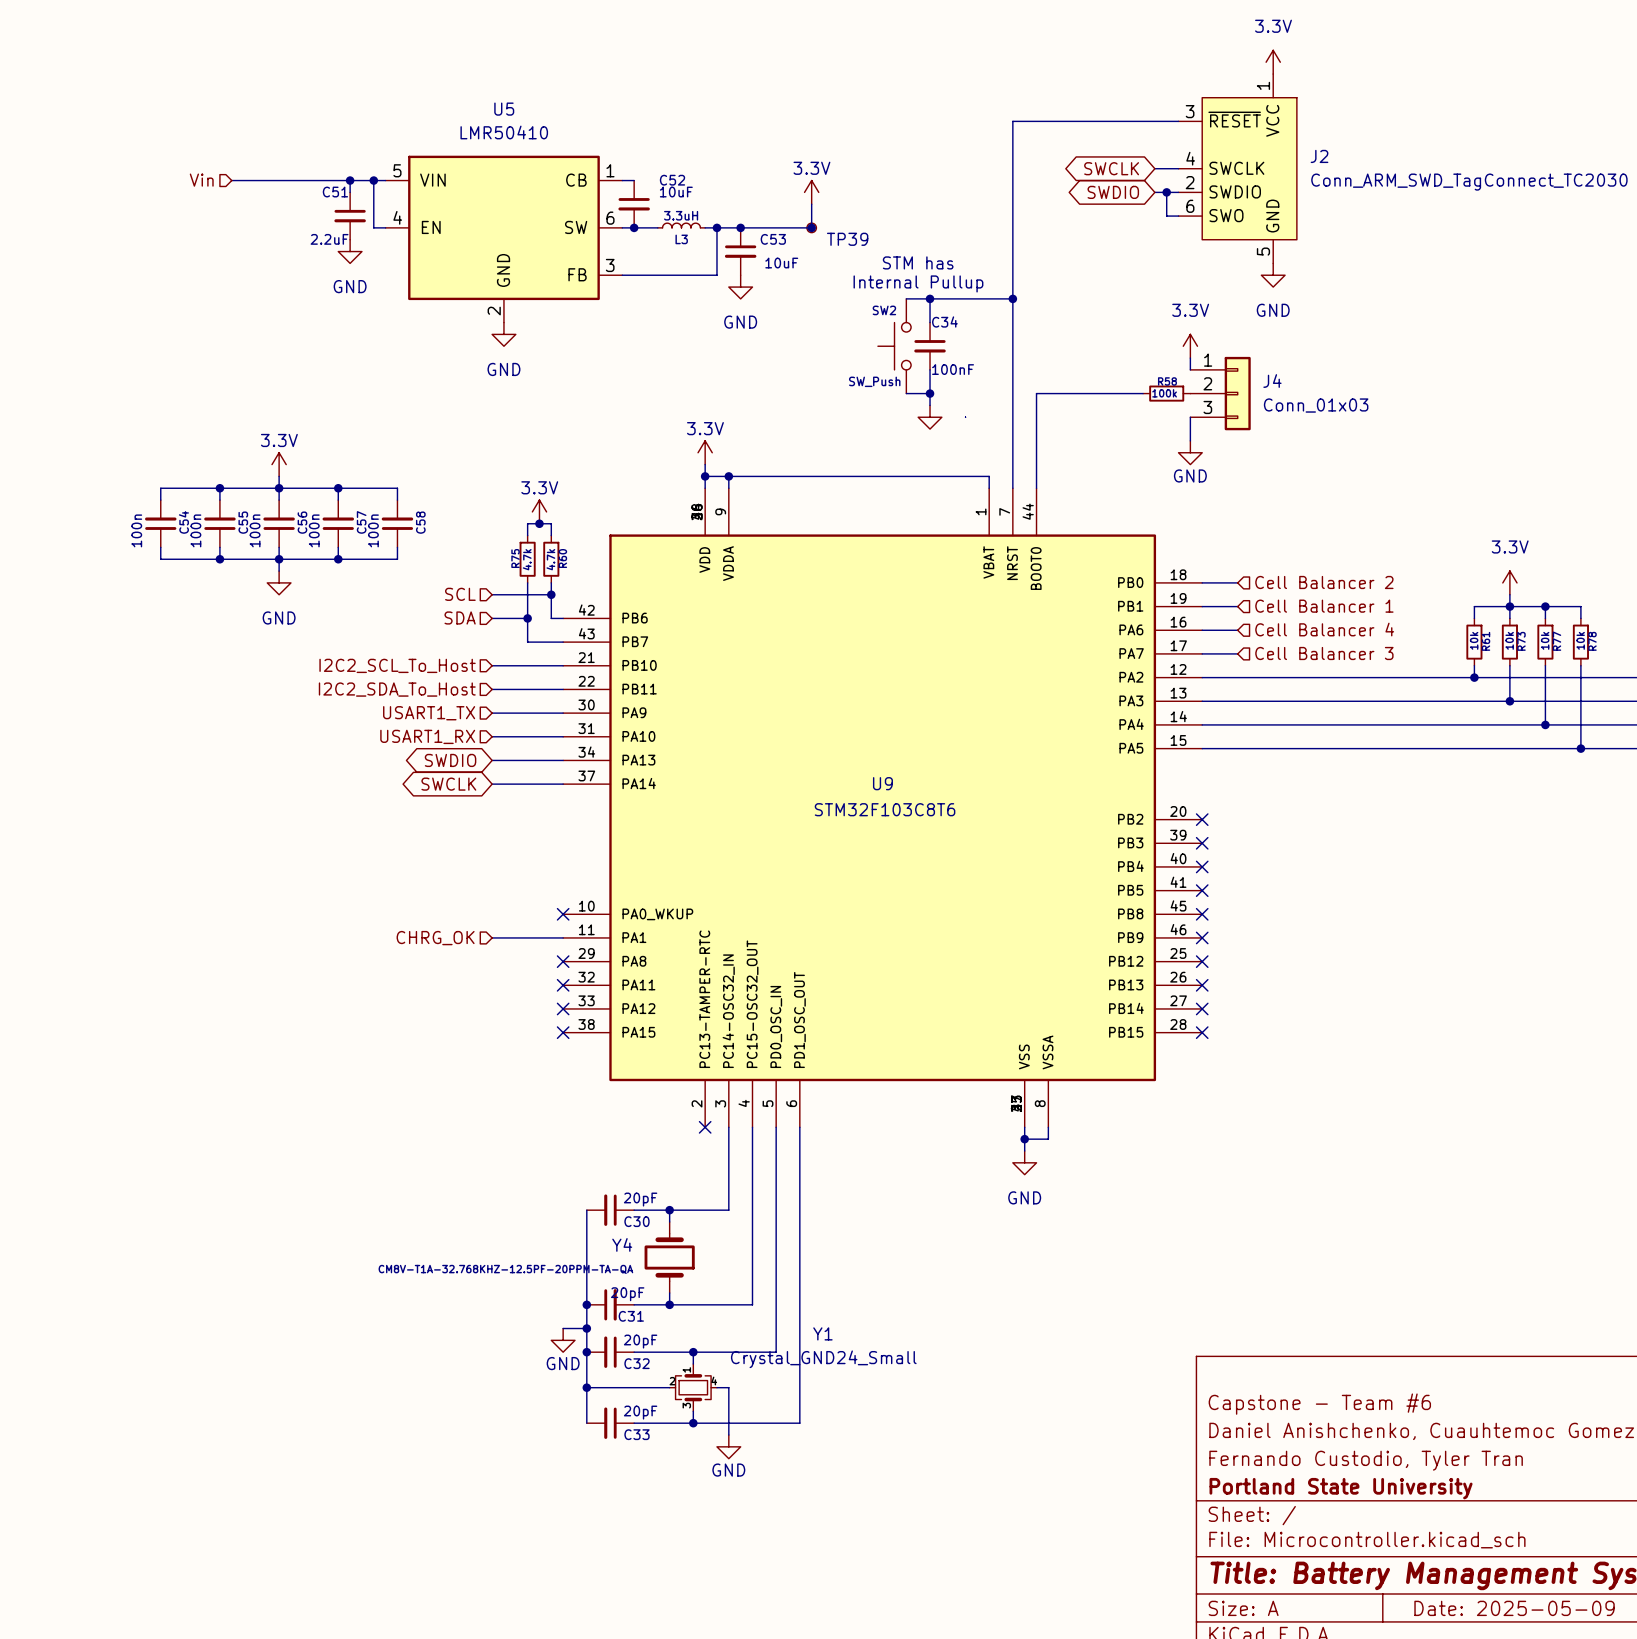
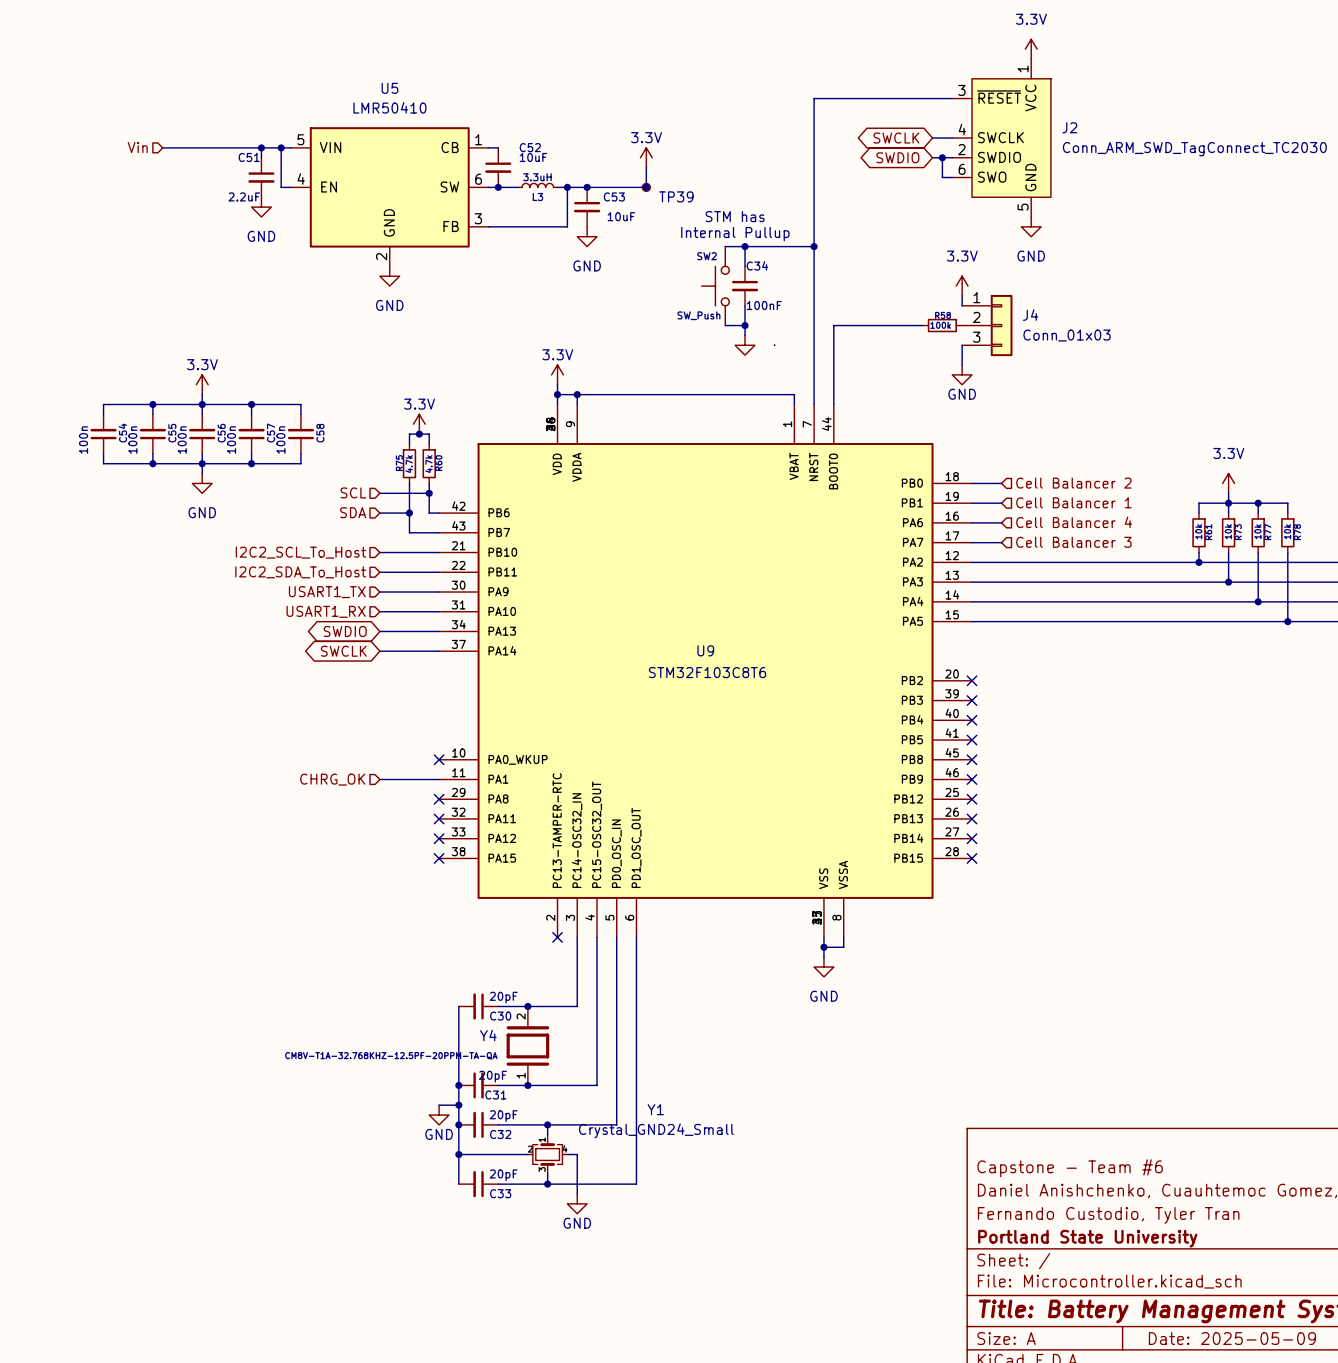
Y4 symbol: [644, 1222, 695, 1294] -> [506, 1006, 550, 1086]

